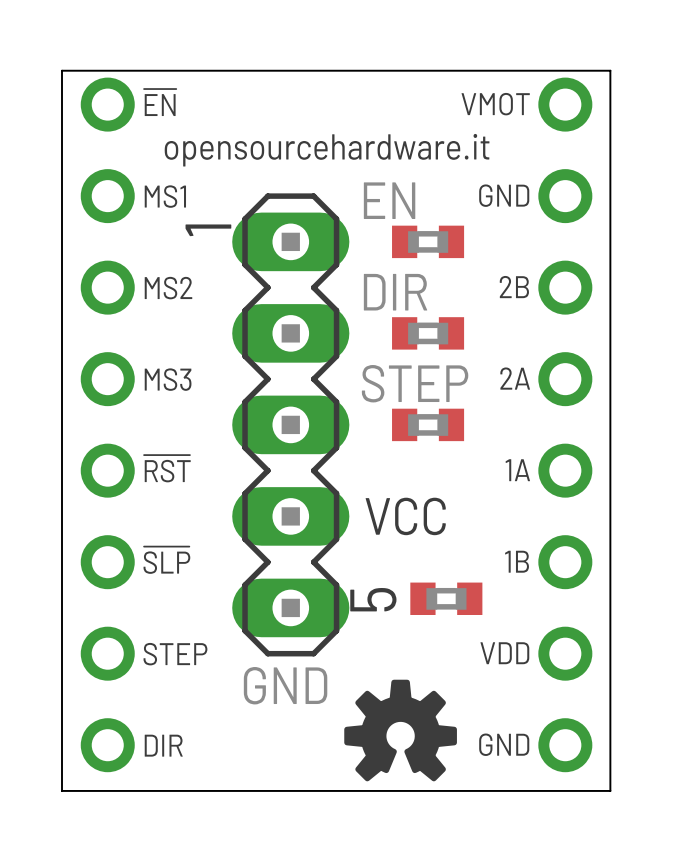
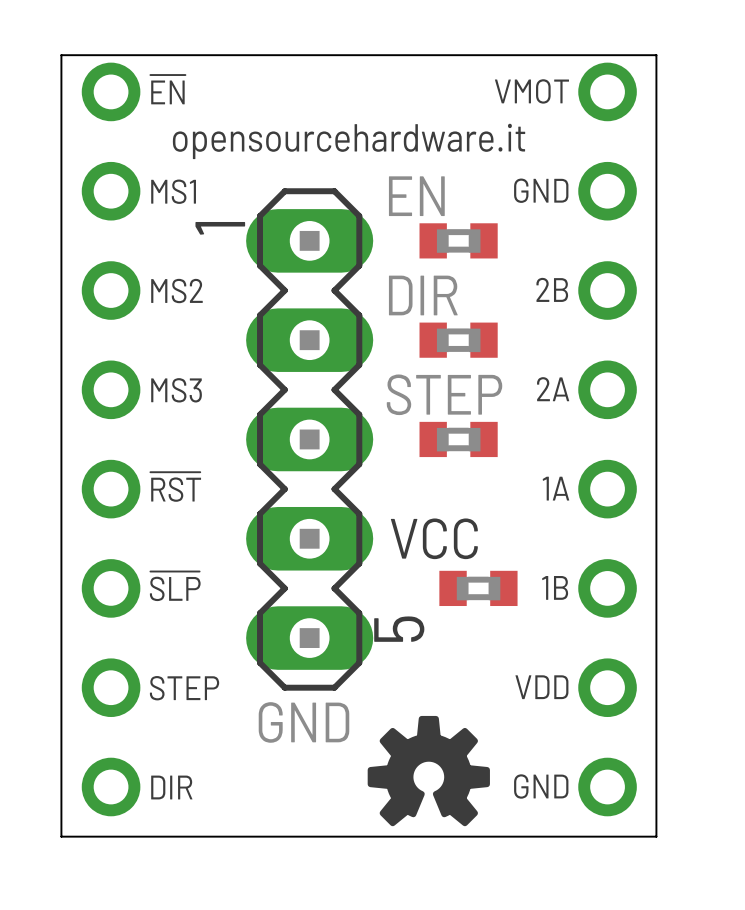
part position: (446, 598) -> (478, 588)

